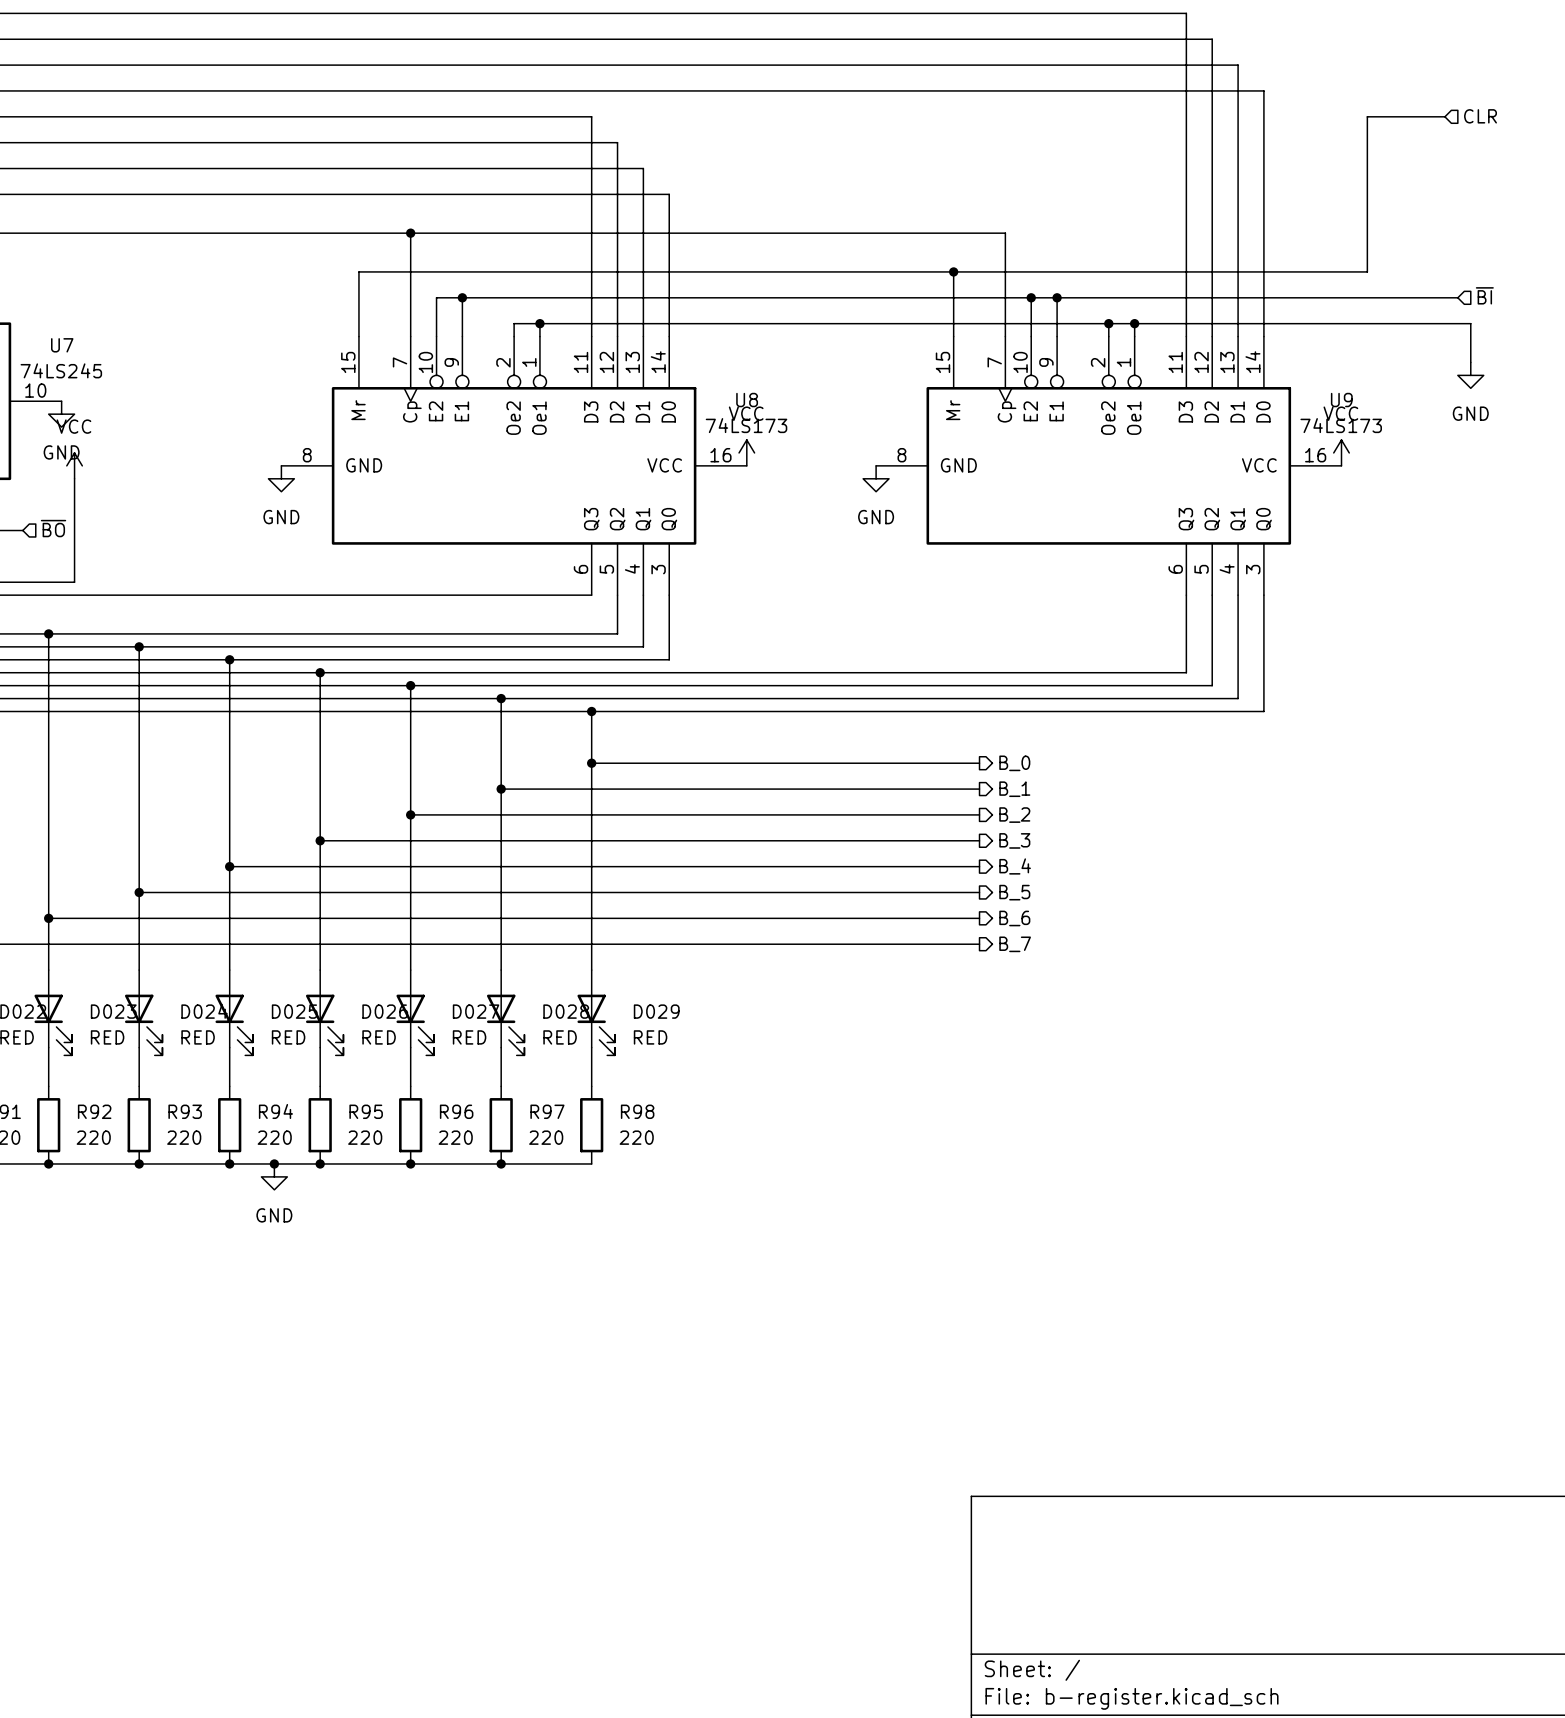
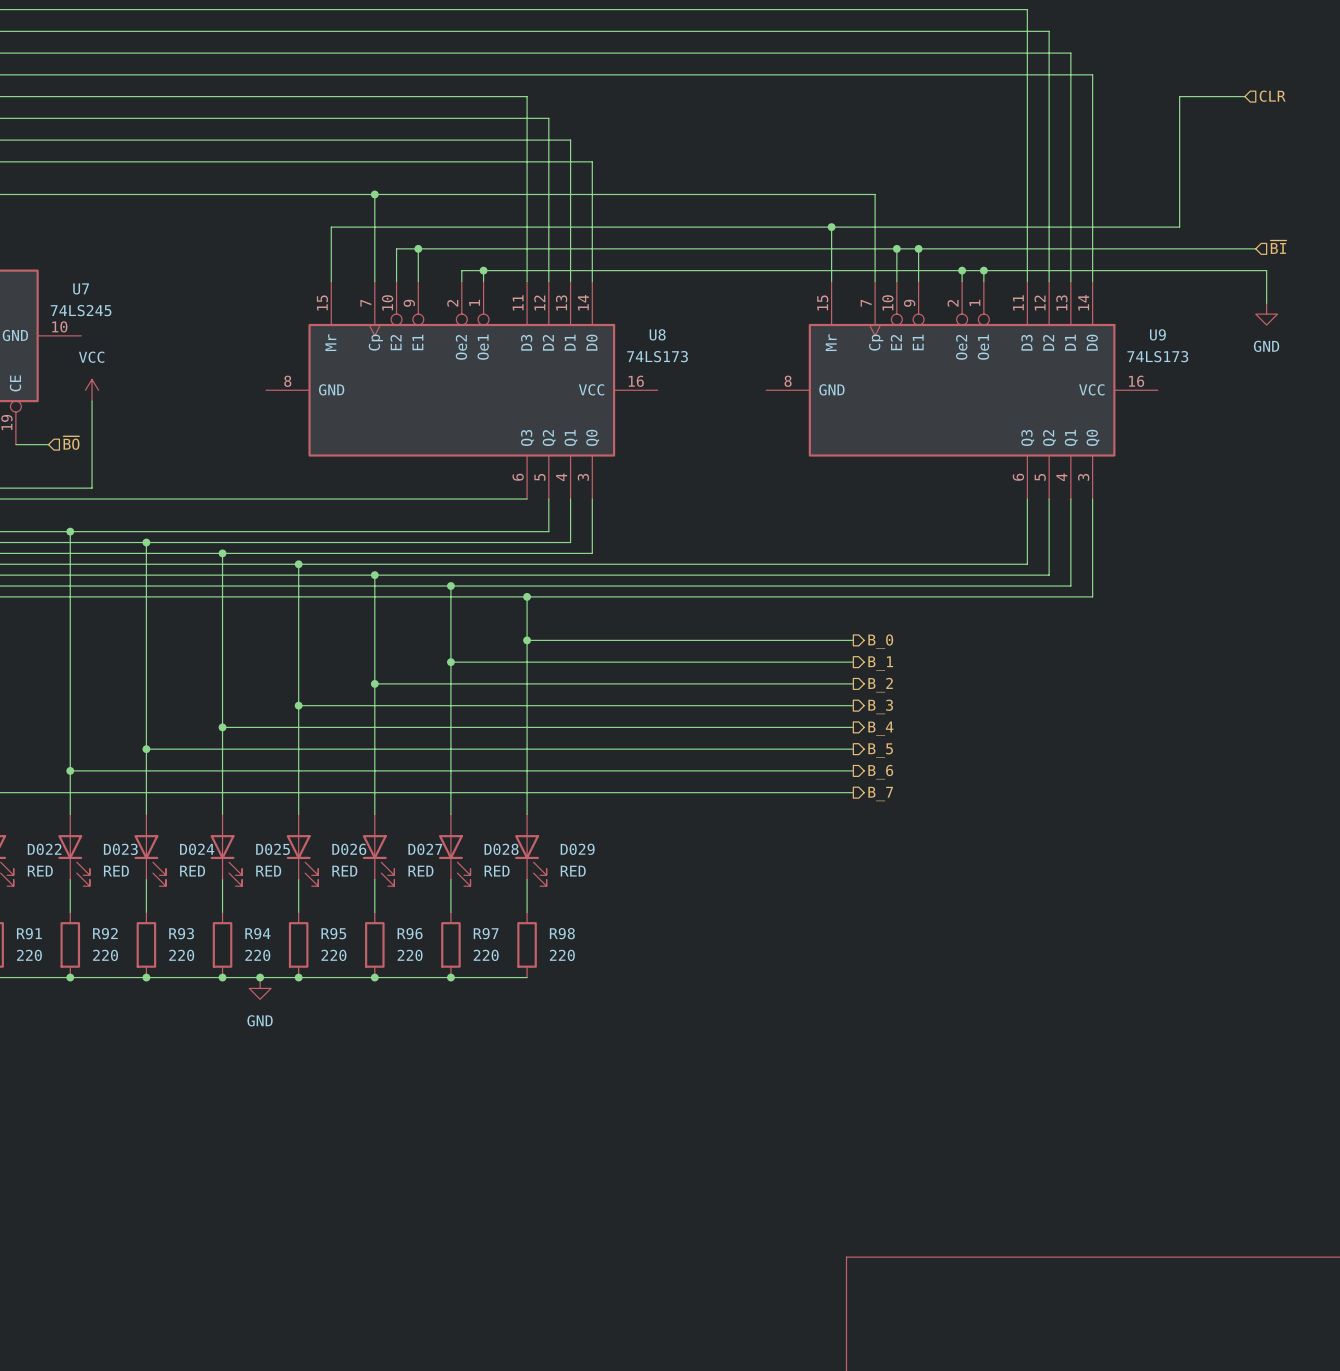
power symbol: GND (61, 414) -> none
power symbol: VCC (746, 452) -> none
power symbol: VCC (1341, 452) -> none
power symbol: GND (281, 478) -> none
power symbol: GND (876, 478) -> none

